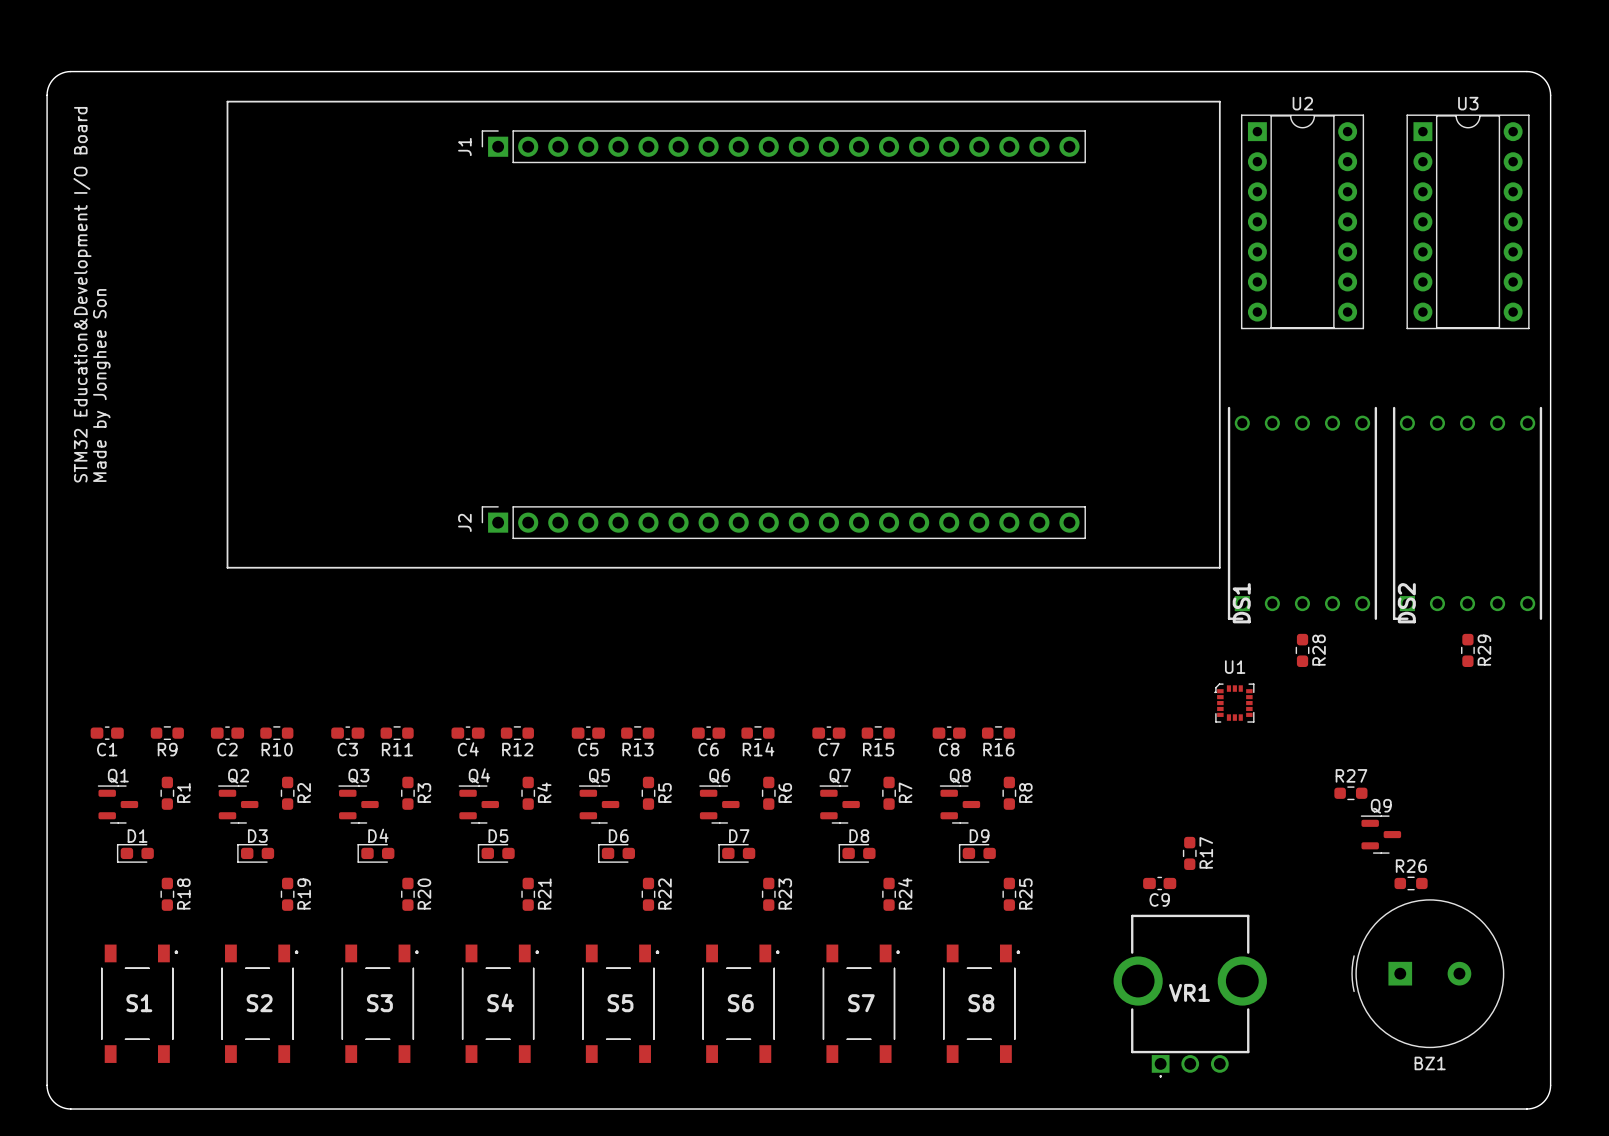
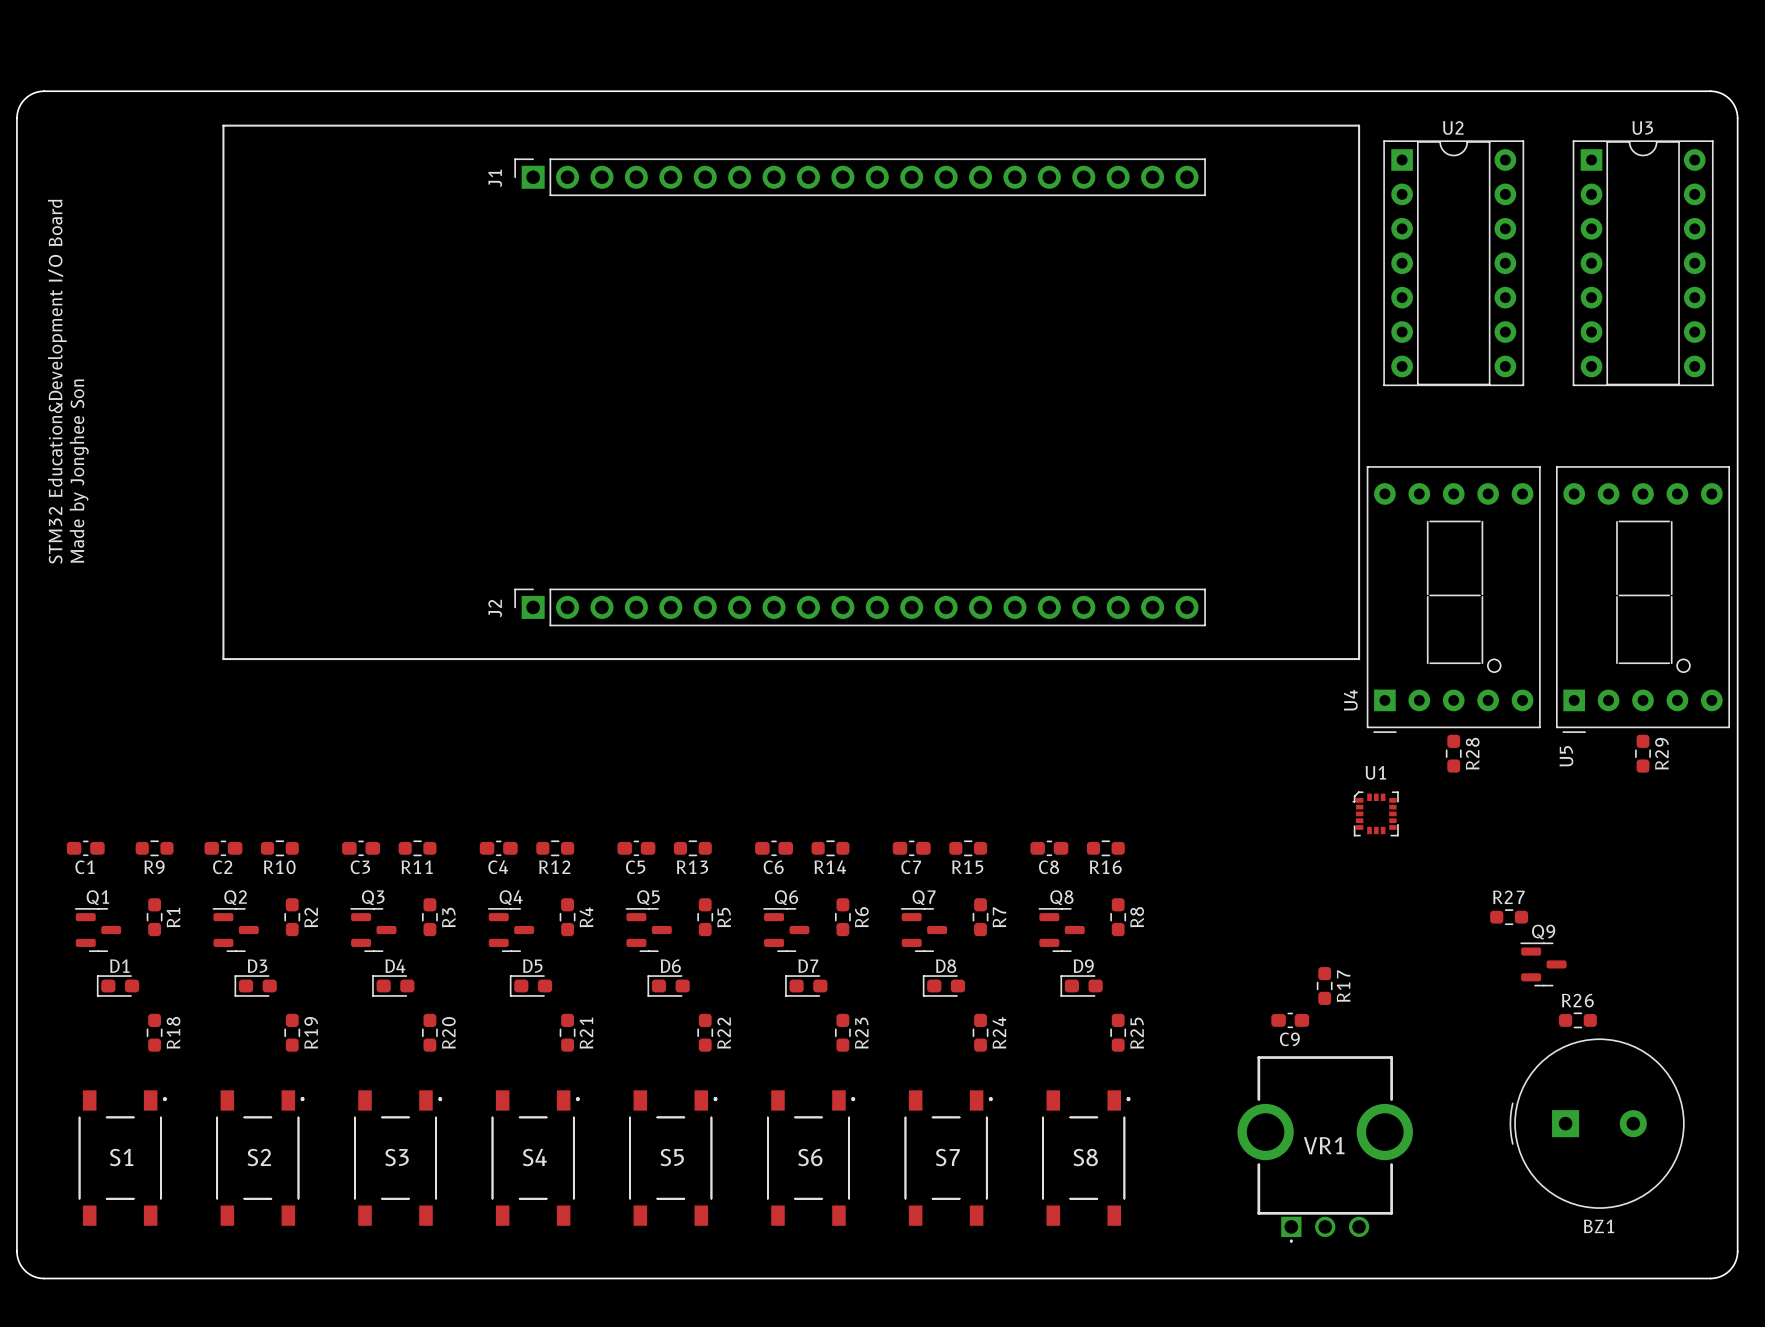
DS1: (1302, 513) -> none
DS2: (1467, 513) -> none
U4: none -> (1453, 599)
U5: none -> (1643, 599)

